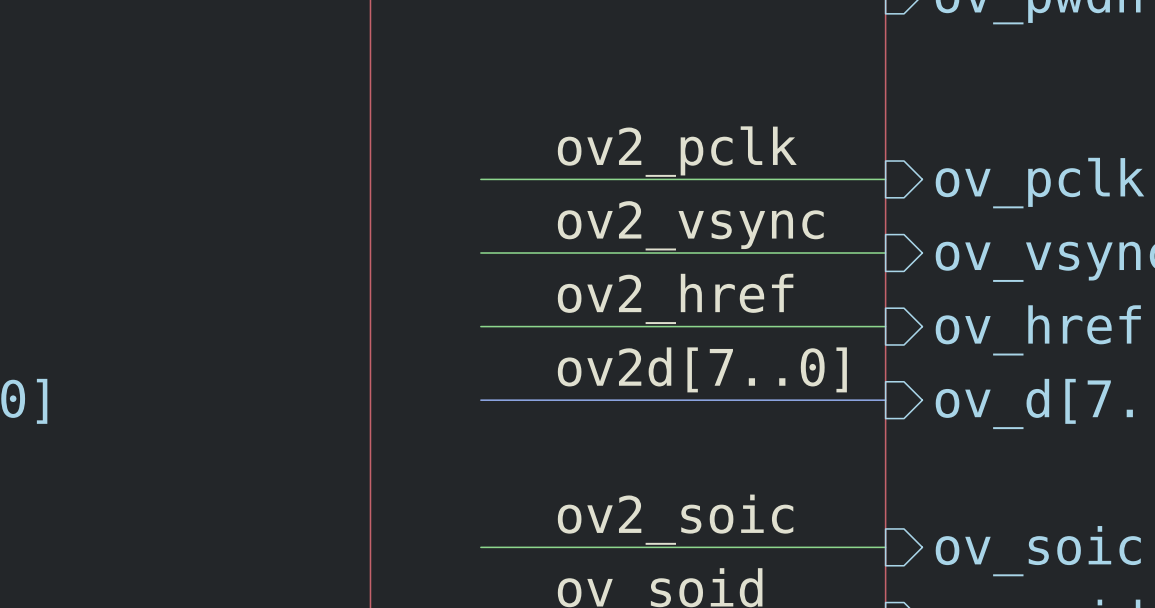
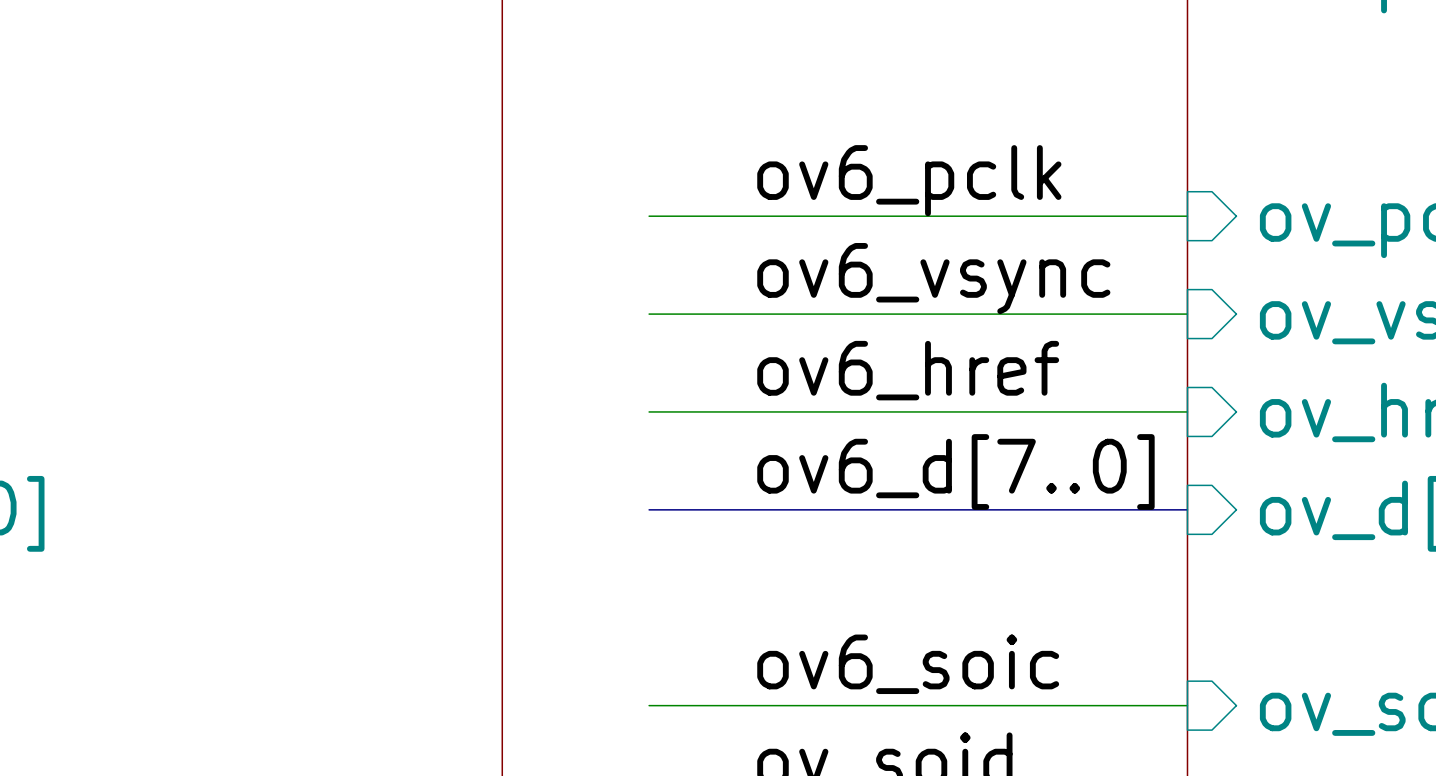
label: ov2_pclk (677, 151) -> ov6_pclk (909, 180)
label: ov2_vsync (690, 225) -> ov6_vsync (933, 278)
label: ov2_href (675, 298) -> ov6_href (908, 370)
label: ov2d[7..0] (702, 369) -> ov6_d[7..0] (955, 472)
label: ov2_soic (675, 519) -> ov6_soic (908, 664)

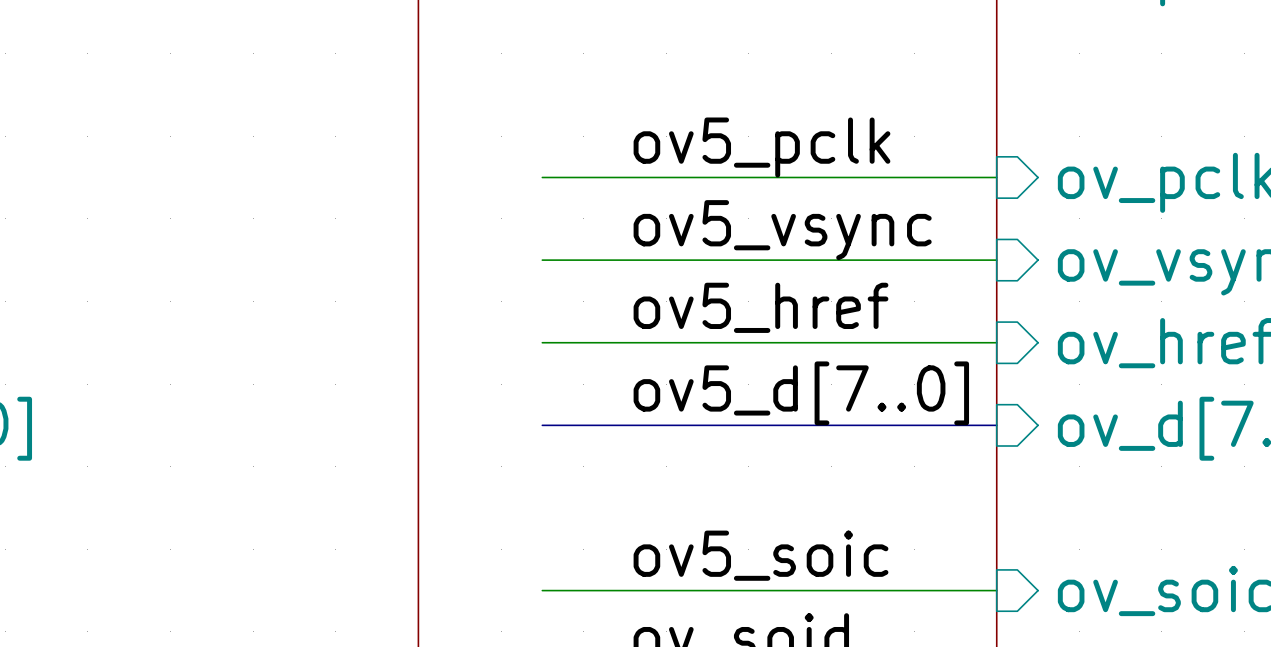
label: ov6_pclk (909, 180) -> ov5_pclk (761, 147)
label: ov6_vsync (933, 278) -> ov5_vsync (782, 230)
label: ov6_href (908, 370) -> ov5_href (760, 307)
label: ov6_d[7..0] (955, 472) -> ov5_d[7..0] (801, 393)
label: ov6_soic (908, 664) -> ov5_soic (760, 555)

